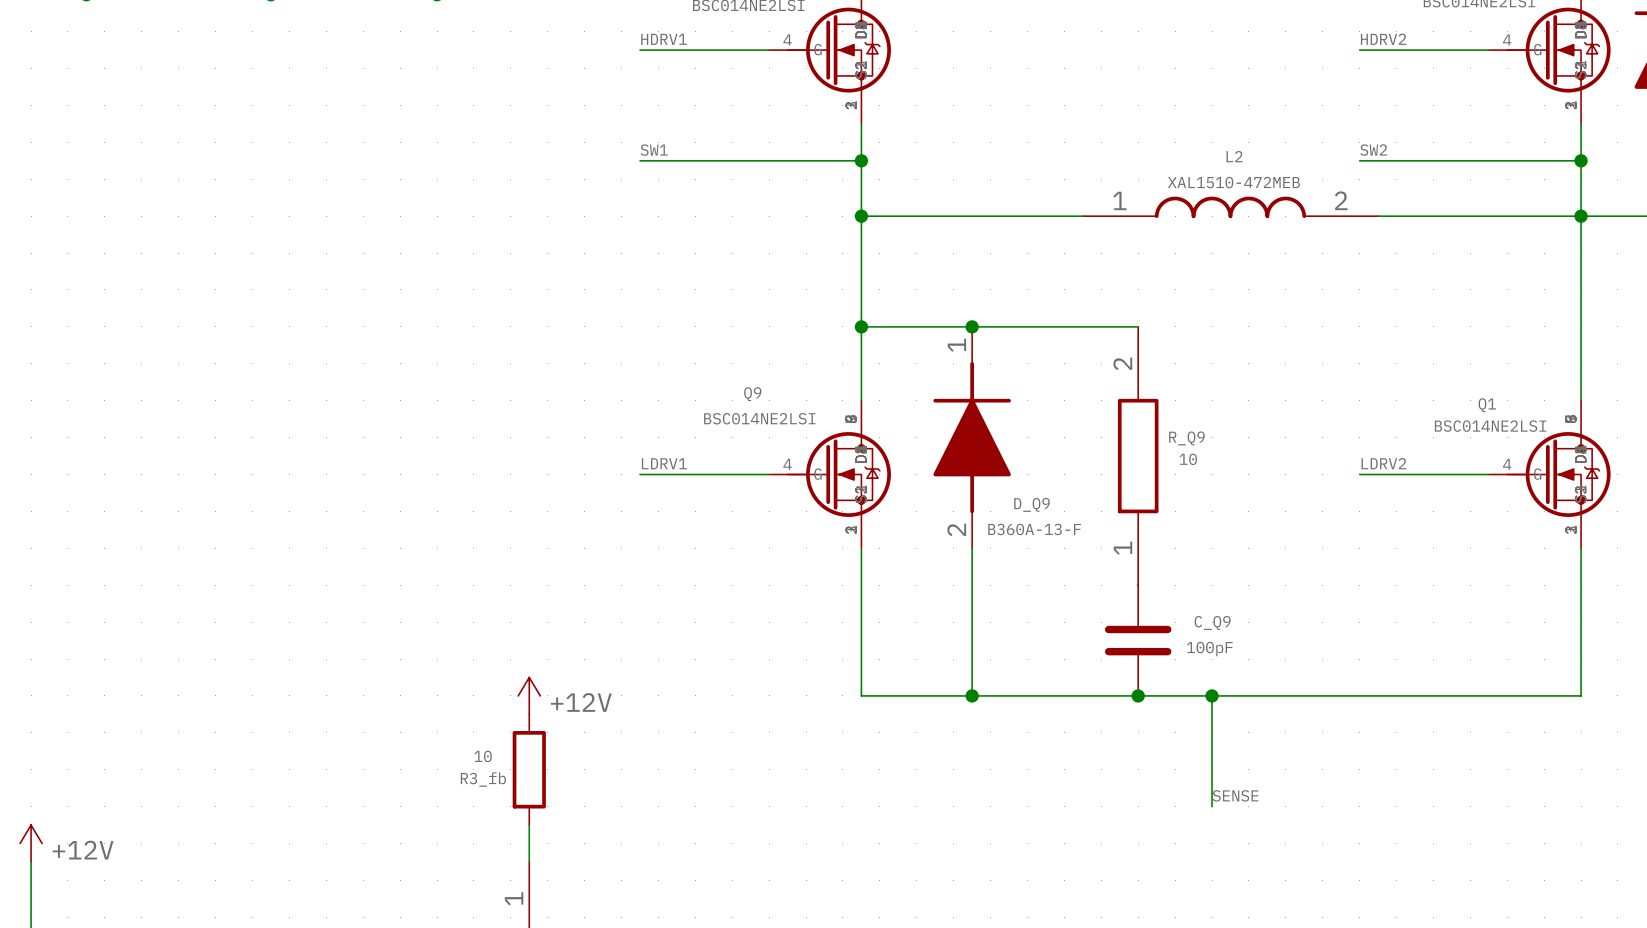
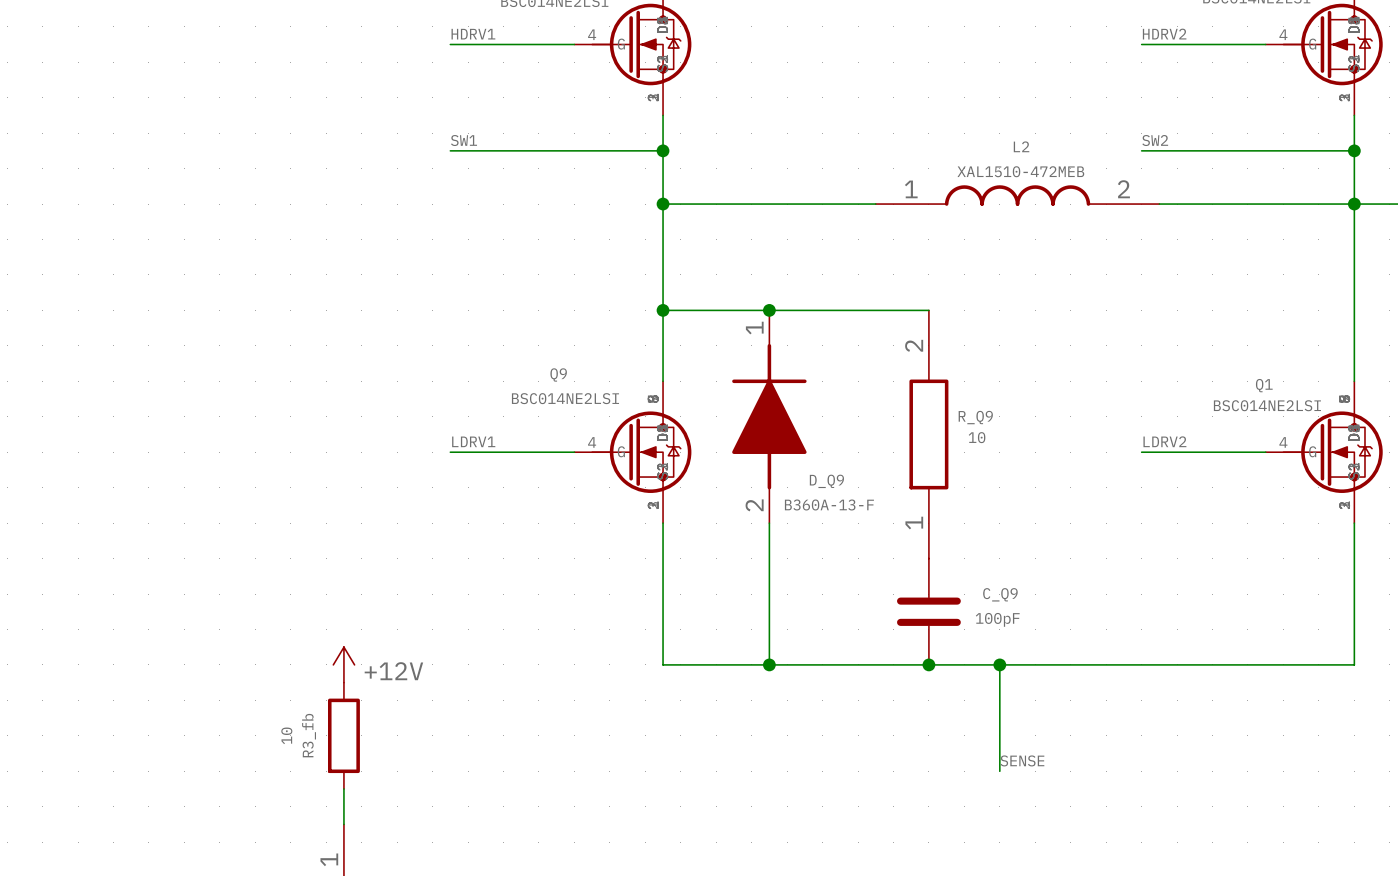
R3_fb value rotation: 0° (483, 756) -> 90° counterclockwise (286, 735)
R3_fb name rotation: 0° (483, 779) -> 90° counterclockwise (309, 735)

